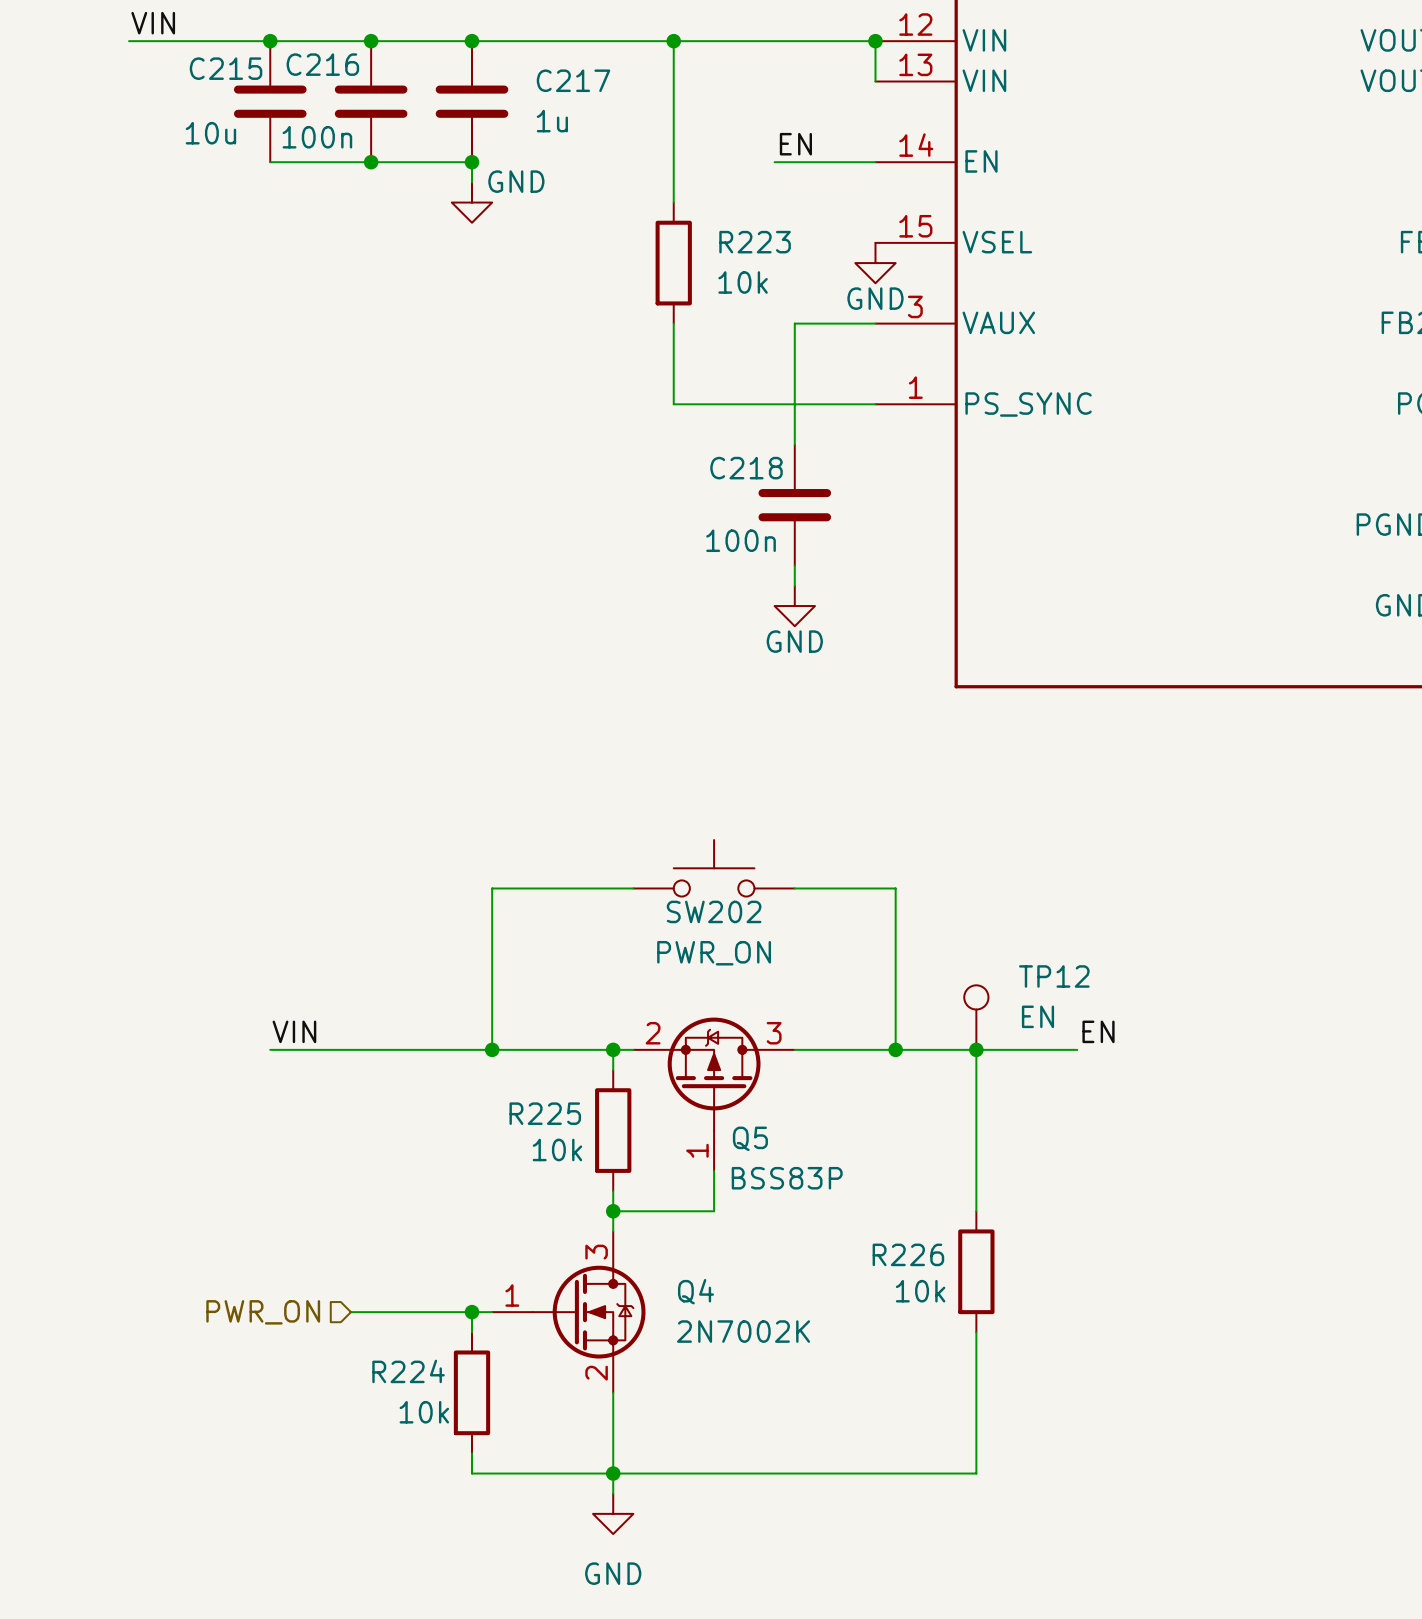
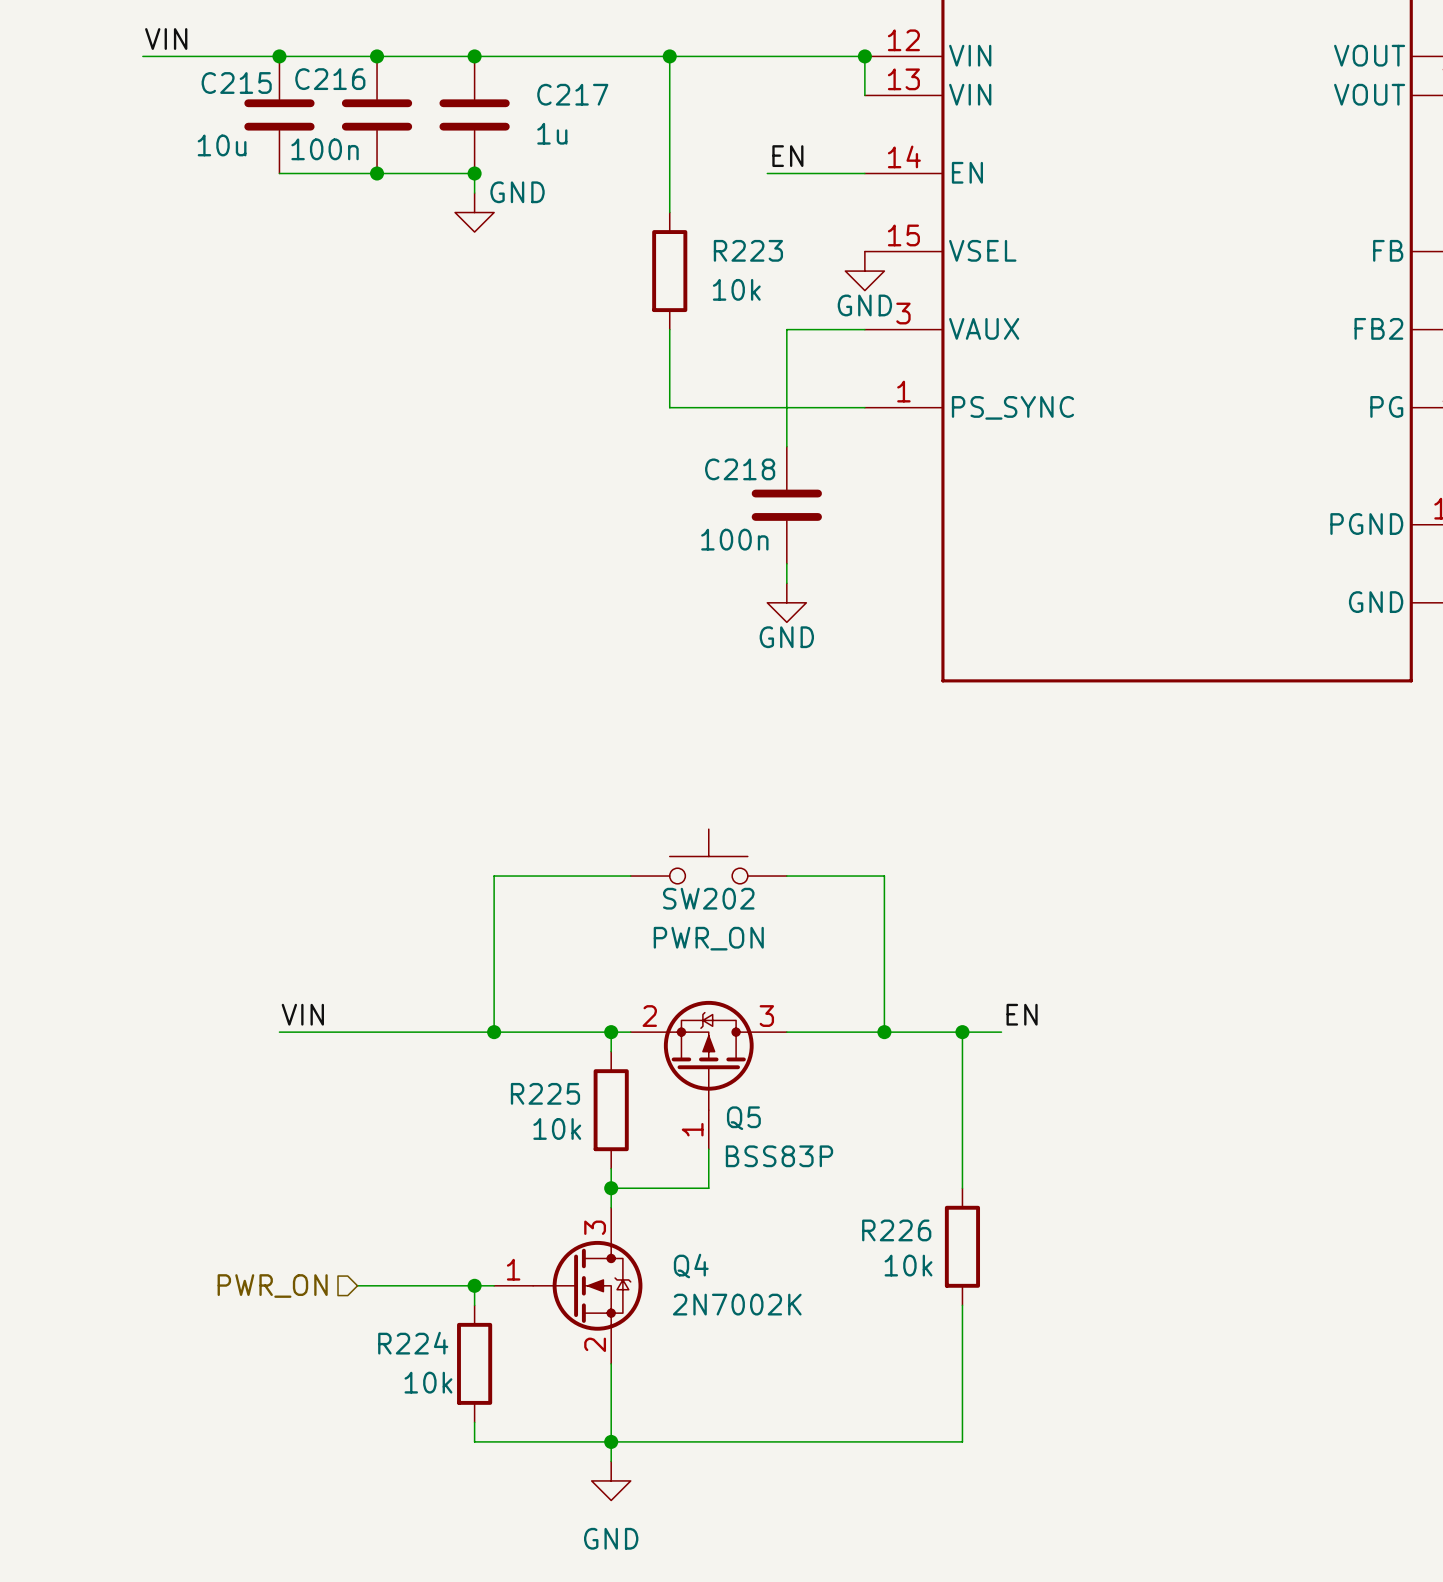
TP12: EN (976, 1017) -> none
label position: EN (1098, 1031) -> EN (1022, 1014)
wire: (1016, 1049) (1077, 1049) -> none

